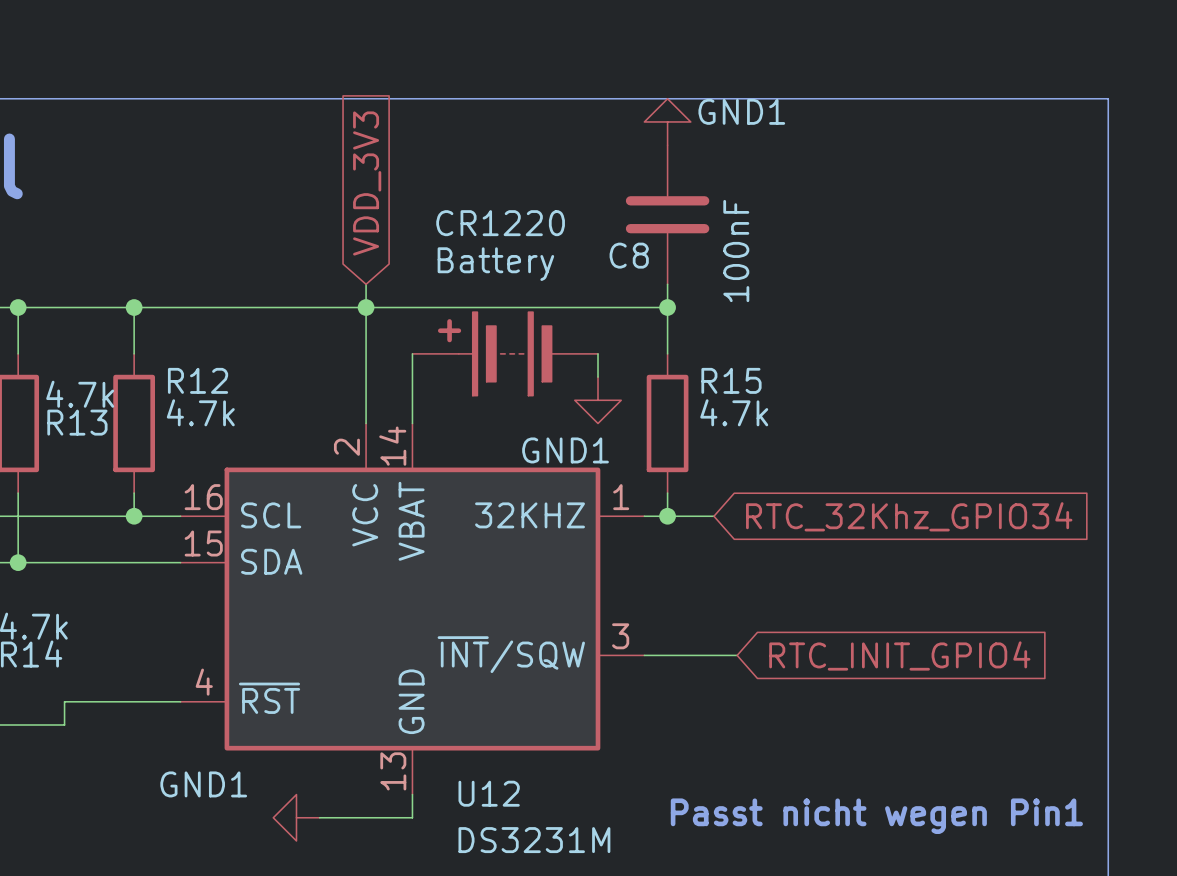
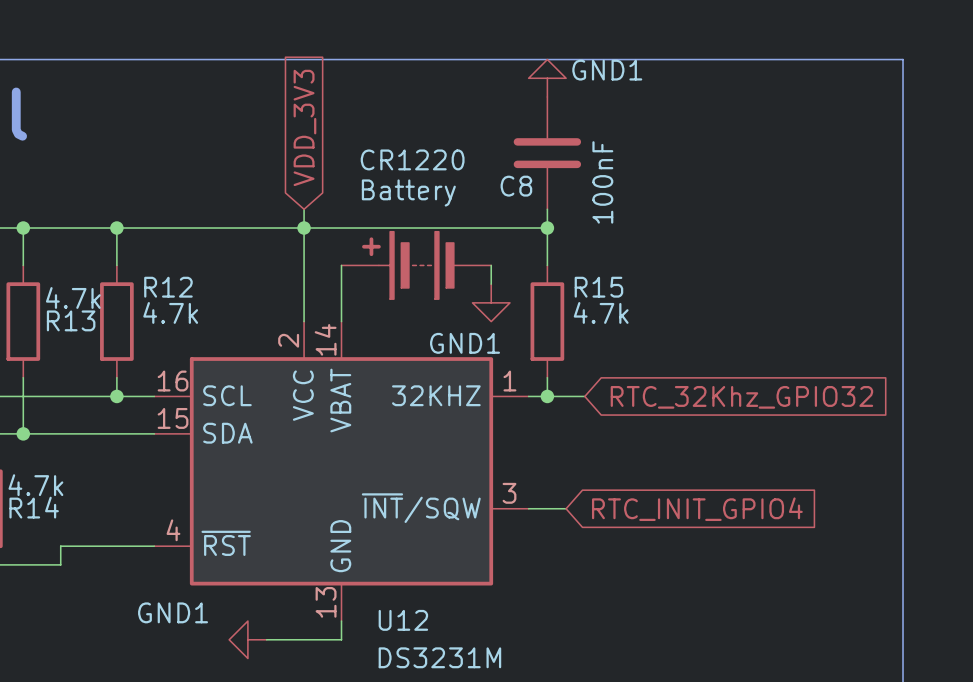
global label: RTC_32Khz_GPIO34 (909, 516) -> RTC_32Khz_GPIO32 (741, 397)
wire: (690, 655) (737, 655) -> none
global label position: RTC_INIT_GPIO4 (899, 655) -> RTC_INIT_GPIO4 (697, 509)
text: Passt nicht wegen Pin1 (876, 816) -> none

